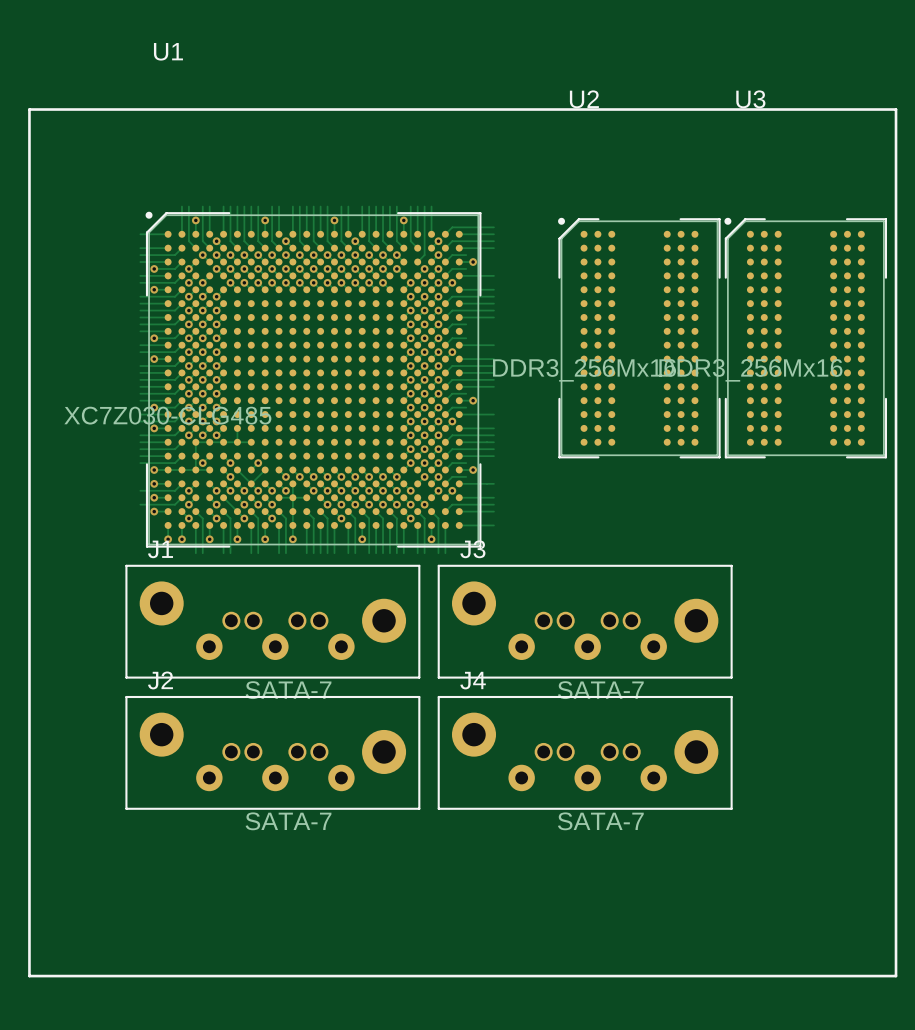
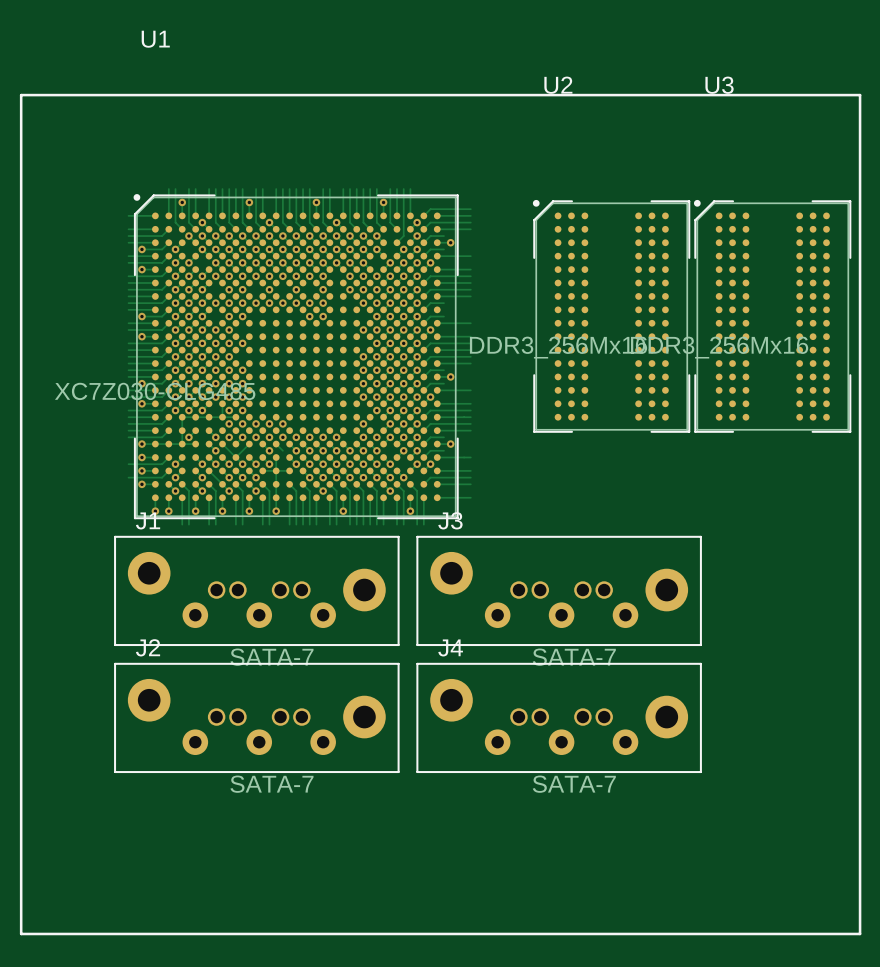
via: none -> (215, 276)
via: none -> (229, 276)
via: none -> (242, 276)
via: none -> (256, 276)
via: none -> (269, 276)
via: none -> (282, 276)
via: none -> (296, 276)
via: none -> (309, 276)
via: none -> (323, 276)
via: none -> (350, 276)
via: none -> (363, 276)
via: none -> (376, 276)
via: none -> (229, 289)
via: none -> (242, 289)
via: none -> (269, 289)
via: none -> (296, 289)
via: none -> (323, 289)
via: none -> (350, 289)
via: none -> (363, 289)
via: none -> (376, 289)
via: none -> (215, 303)
via: none -> (229, 303)
via: none -> (242, 303)
via: none -> (256, 303)
via: none -> (269, 303)
via: none -> (282, 303)
via: none -> (296, 303)
via: none -> (309, 303)
via: none -> (323, 303)
via: none -> (363, 303)
via: none -> (376, 303)
via: none -> (229, 316)
via: none -> (242, 316)
via: none -> (309, 316)
via: none -> (323, 316)
via: none -> (376, 316)
via: none -> (215, 329)
via: none -> (229, 329)
via: none -> (363, 329)
via: none -> (376, 329)
via: none -> (215, 343)
via: none -> (229, 343)
via: none -> (242, 343)
via: none -> (376, 343)
via: none -> (215, 356)
via: none -> (229, 356)
via: none -> (363, 356)
via: none -> (376, 356)
via: none -> (215, 370)
via: none -> (229, 370)
via: none -> (242, 370)
via: none -> (363, 370)
via: none -> (376, 370)
via: none -> (215, 383)
via: none -> (229, 383)
via: none -> (242, 383)
via: none -> (363, 383)
via: none -> (376, 383)
via: none -> (215, 397)
via: none -> (229, 397)
via: none -> (242, 397)
via: none -> (363, 397)
via: none -> (376, 397)
via: none -> (229, 410)
via: none -> (242, 410)
via: none -> (376, 410)
via: none -> (229, 423)
via: none -> (242, 423)
via: none -> (256, 423)
via: none -> (269, 423)
via: none -> (282, 423)
via: none -> (363, 423)
via: none -> (229, 437)
via: none -> (256, 437)
via: none -> (269, 437)
via: none -> (282, 437)
via: none -> (296, 437)
via: none -> (309, 437)
via: none -> (323, 437)
via: none -> (336, 437)
via: none -> (363, 437)
via: none -> (376, 437)
via: (299, 476) -> none

